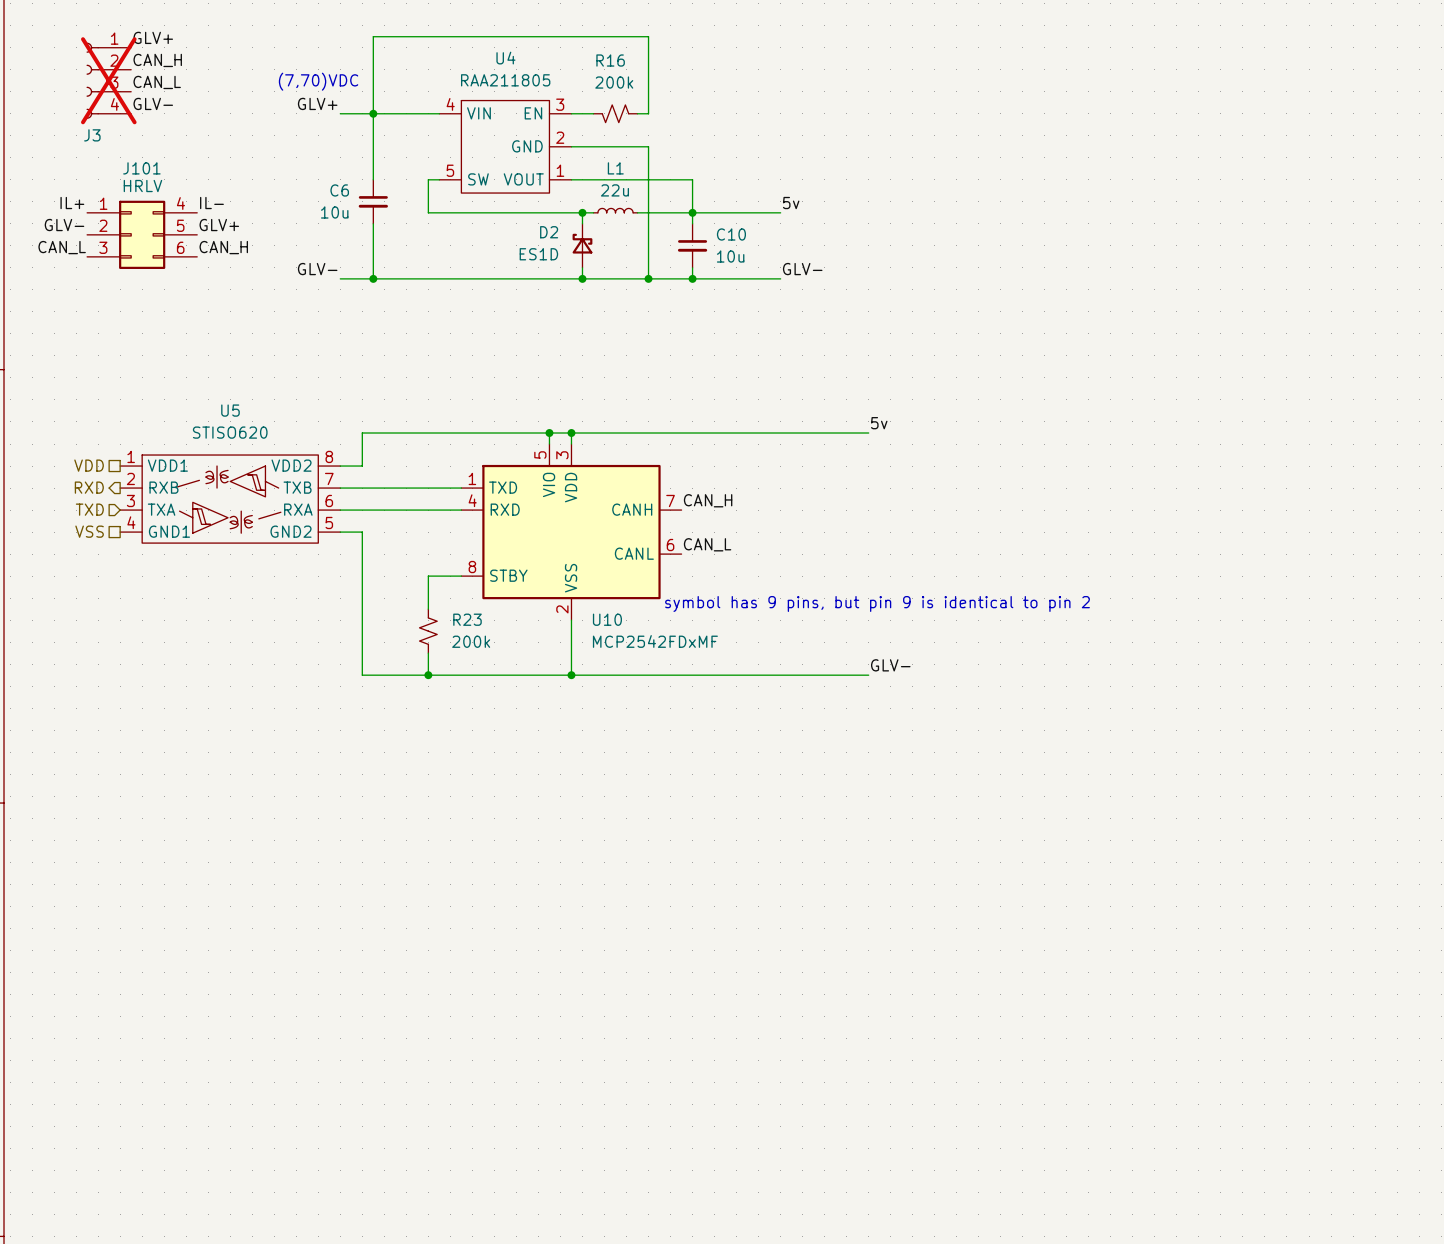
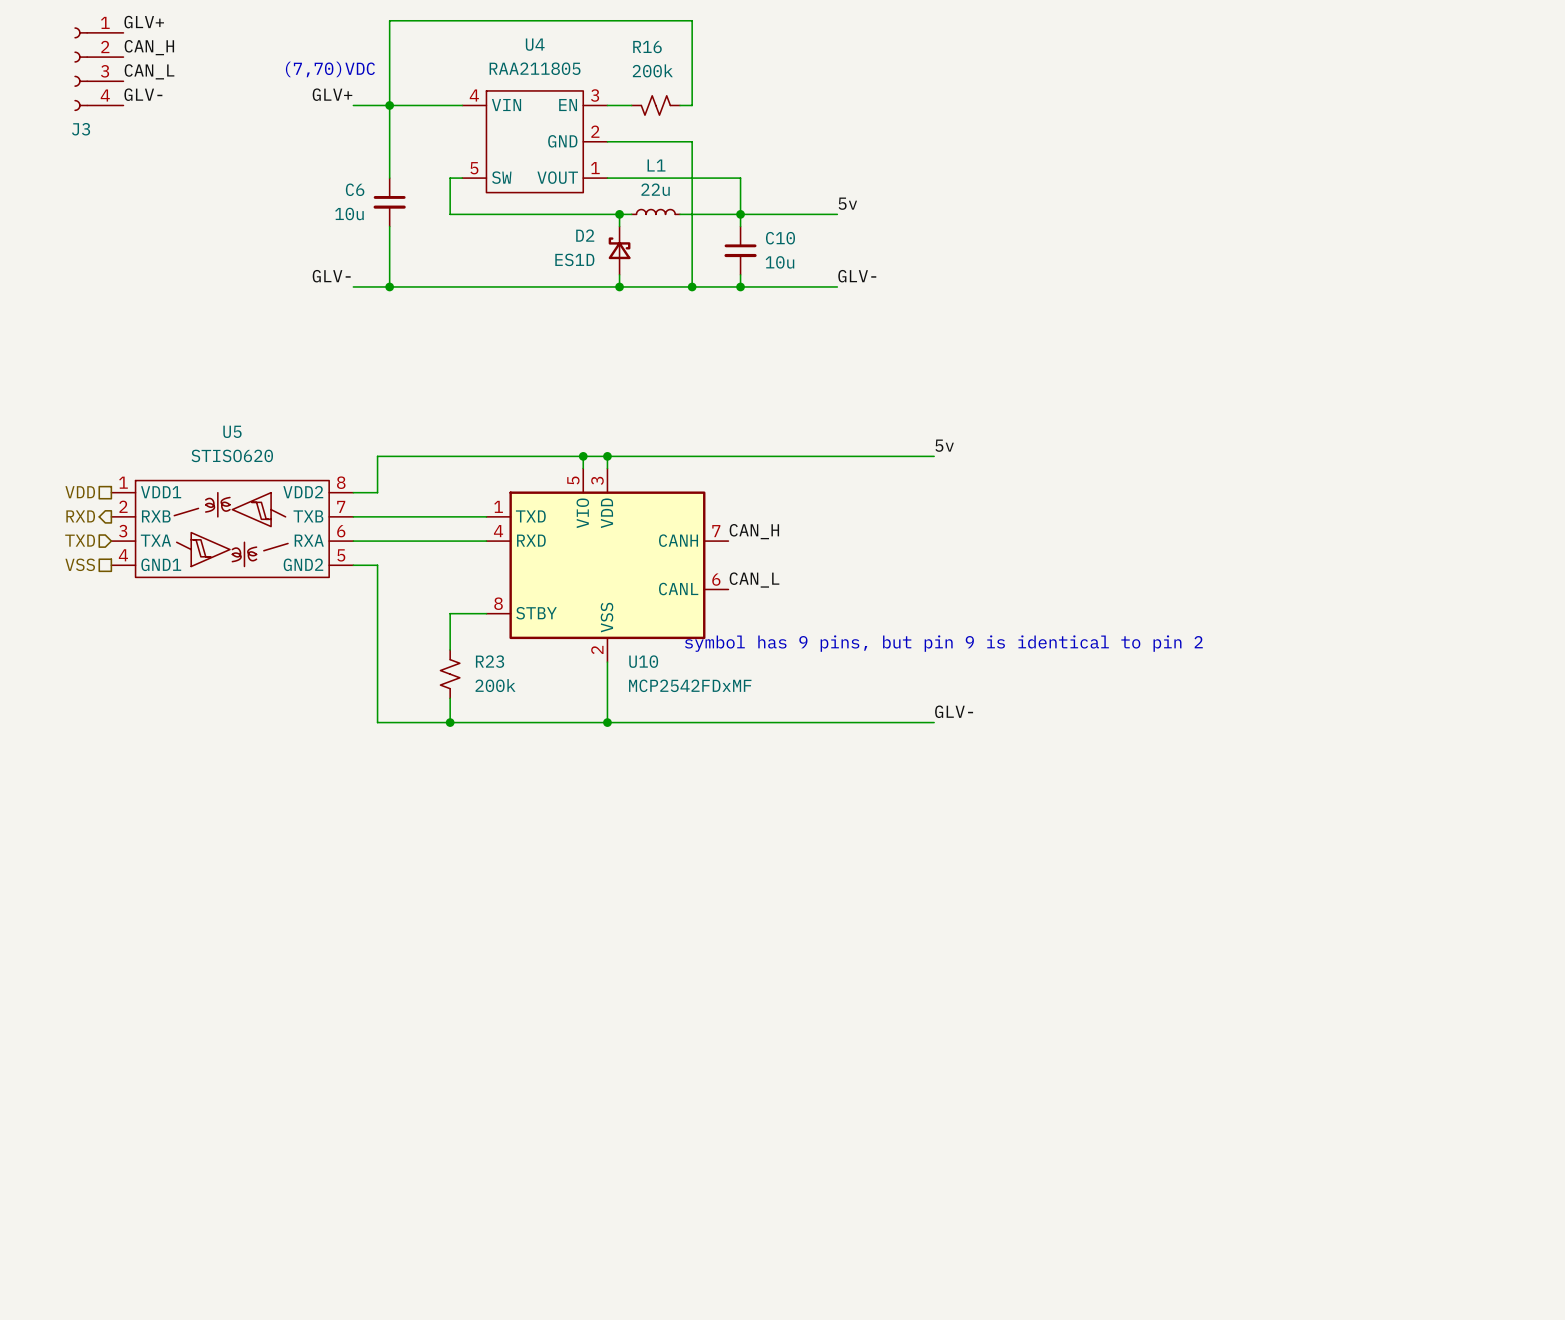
J3 do-not-place cross: (108, 80) -> none
label: IL+ (72, 203) -> none
label: IL- (211, 203) -> none
label: GLV- (64, 225) -> none
label: GLV+ (219, 225) -> none
J101: HRLV (142, 234) -> none
label: CAN_L (62, 247) -> none
label: CAN_H (223, 247) -> none

